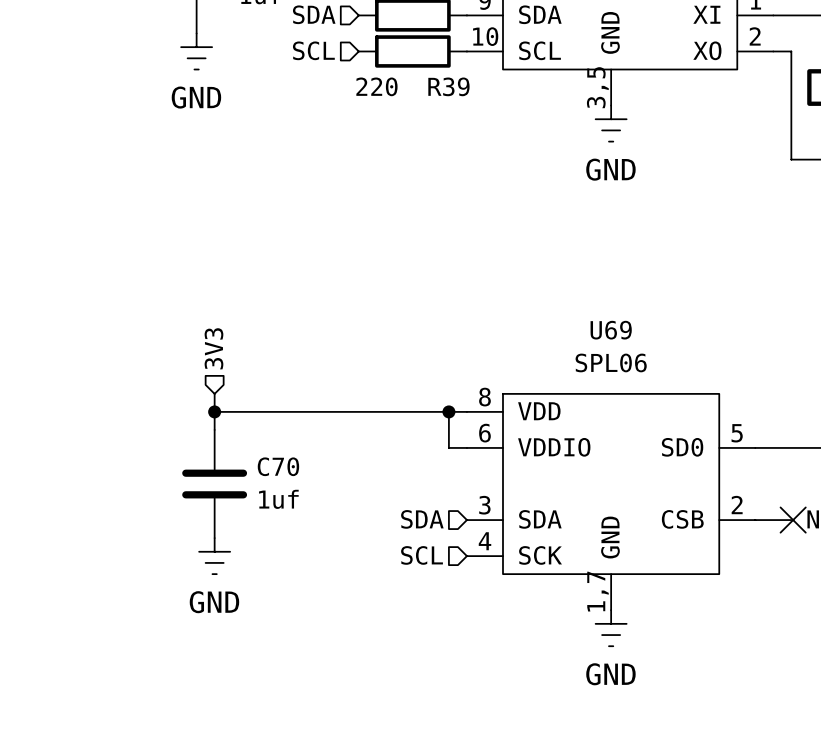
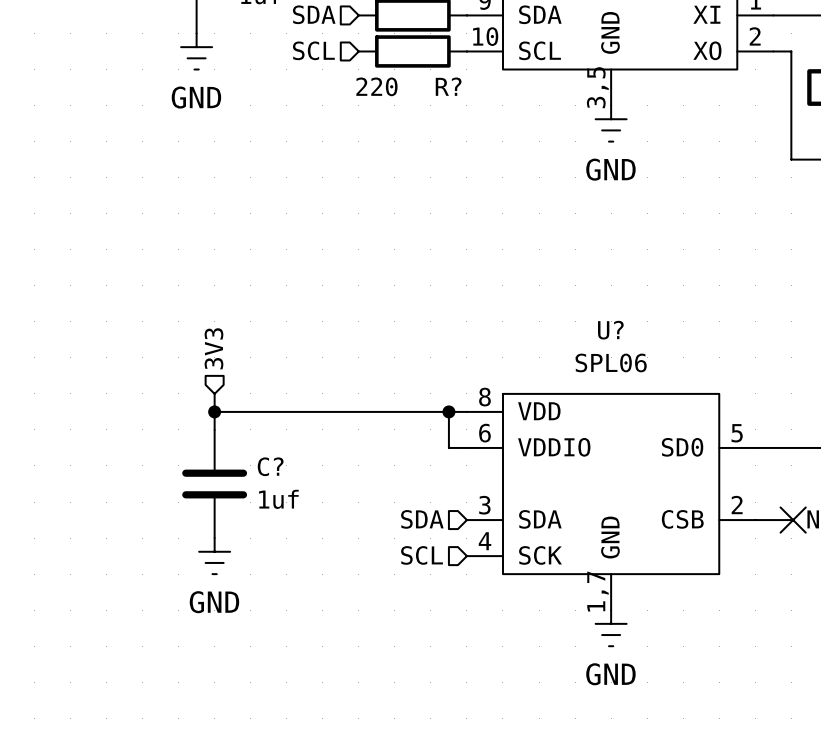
R39 name: R39 (448, 86) -> R? (448, 86)
U69 name: U69 (611, 330) -> U? (610, 330)
C70 name: C70 (278, 466) -> C? (270, 466)

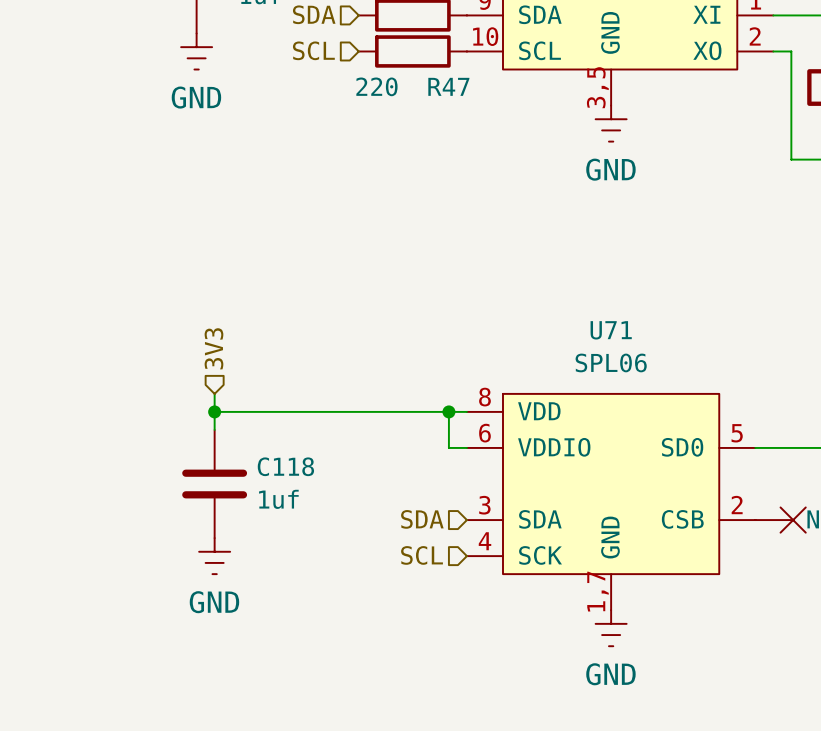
R? name: R? (448, 86) -> R47 (448, 86)
U? name: U? (610, 330) -> U71 (611, 330)
C? name: C? (270, 466) -> C118 (285, 466)

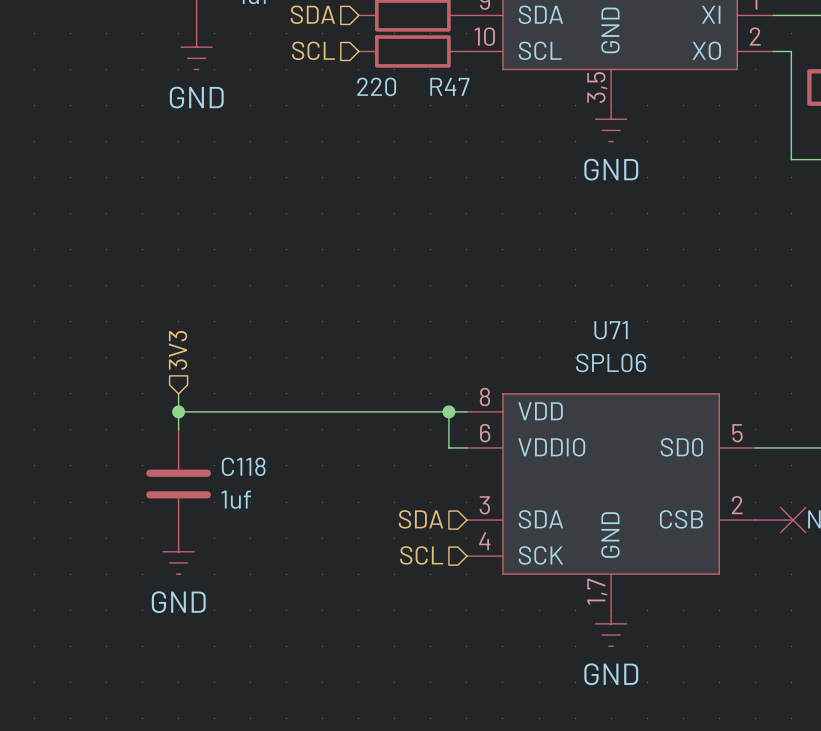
hierarchical label position: 3V3 (213, 348) -> 3V3 (178, 350)
wire: (214, 393) (214, 429) -> (178, 393) (178, 429)
wire: none -> (178, 411) (214, 411)
junction position: (214, 411) -> (178, 411)
C118 position: (214, 484) -> (178, 484)
power symbol position: GND (214, 556) -> GND (178, 556)

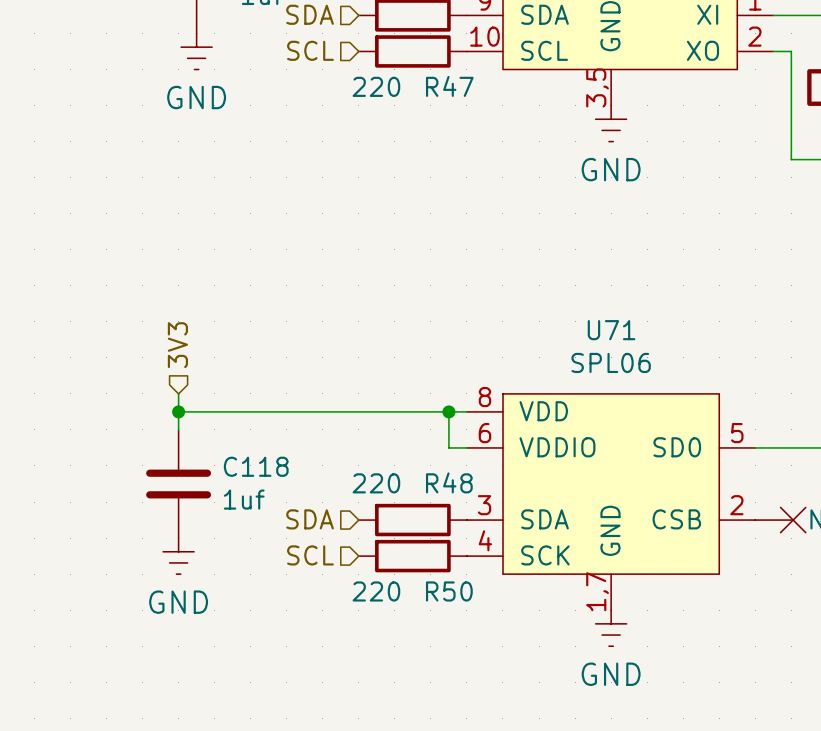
hierarchical label position: SDA (420, 519) -> SDA (310, 519)
R48: none -> 220 (412, 520)
hierarchical label position: SCL (421, 555) -> SCL (310, 555)
R50: none -> 220 (412, 556)

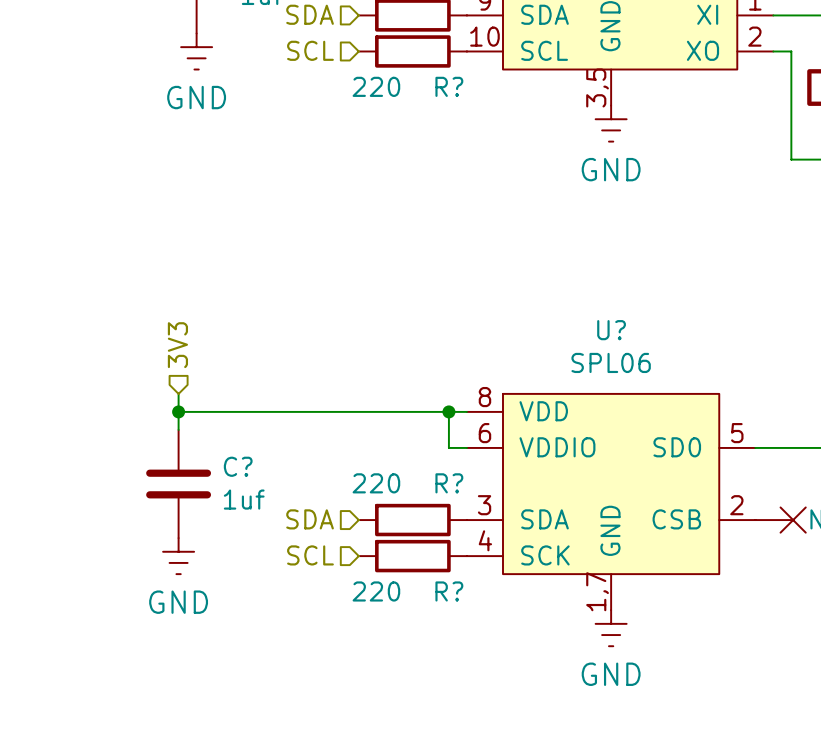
R47 name: R47 (449, 86) -> R? (449, 86)
U71 name: U71 (611, 330) -> U? (611, 330)
C118 name: C118 (256, 466) -> C? (238, 466)
R48 name: R48 (449, 482) -> R? (449, 483)
R50 name: R50 (449, 591) -> R? (449, 591)

